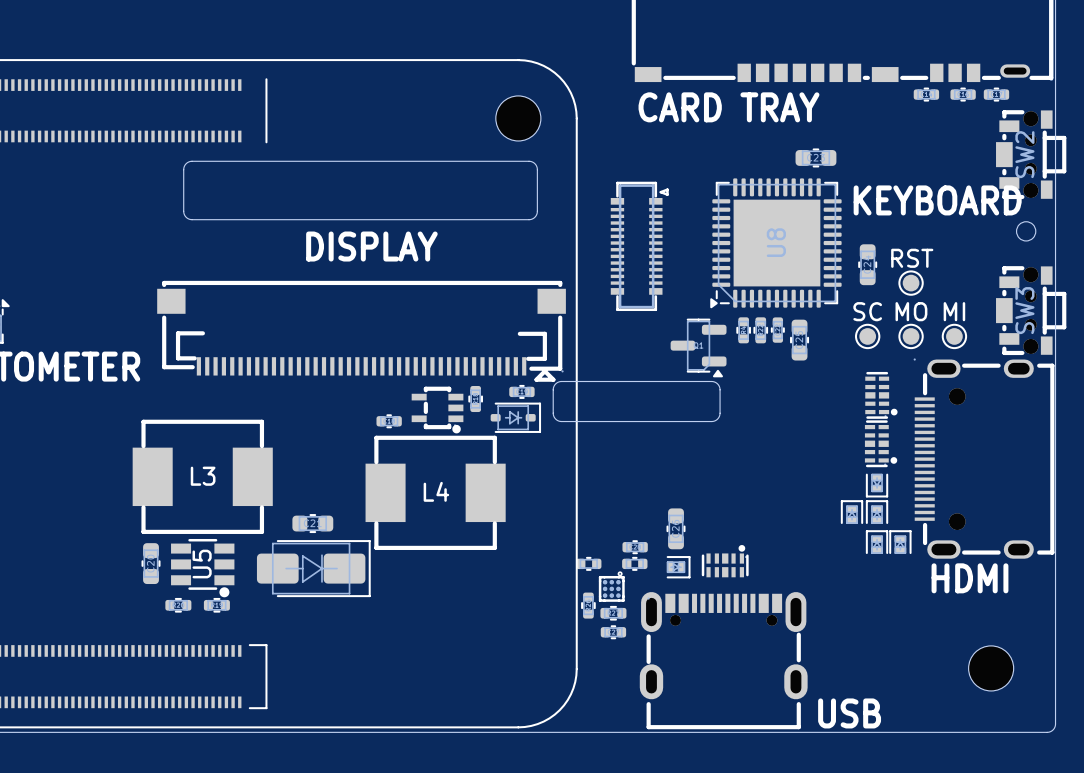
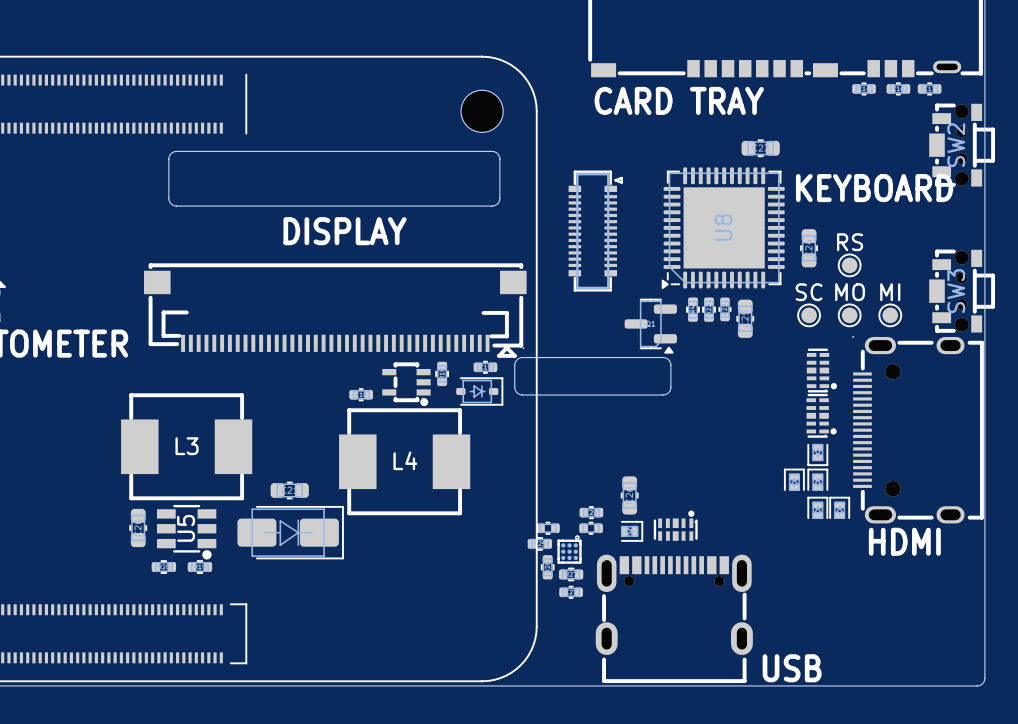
drawing: [1016, 221, 1037, 242] -> none
RST name: RST (912, 258) -> RS (850, 242)
part: none -> (539, 543)
part: (991, 668) -> none

